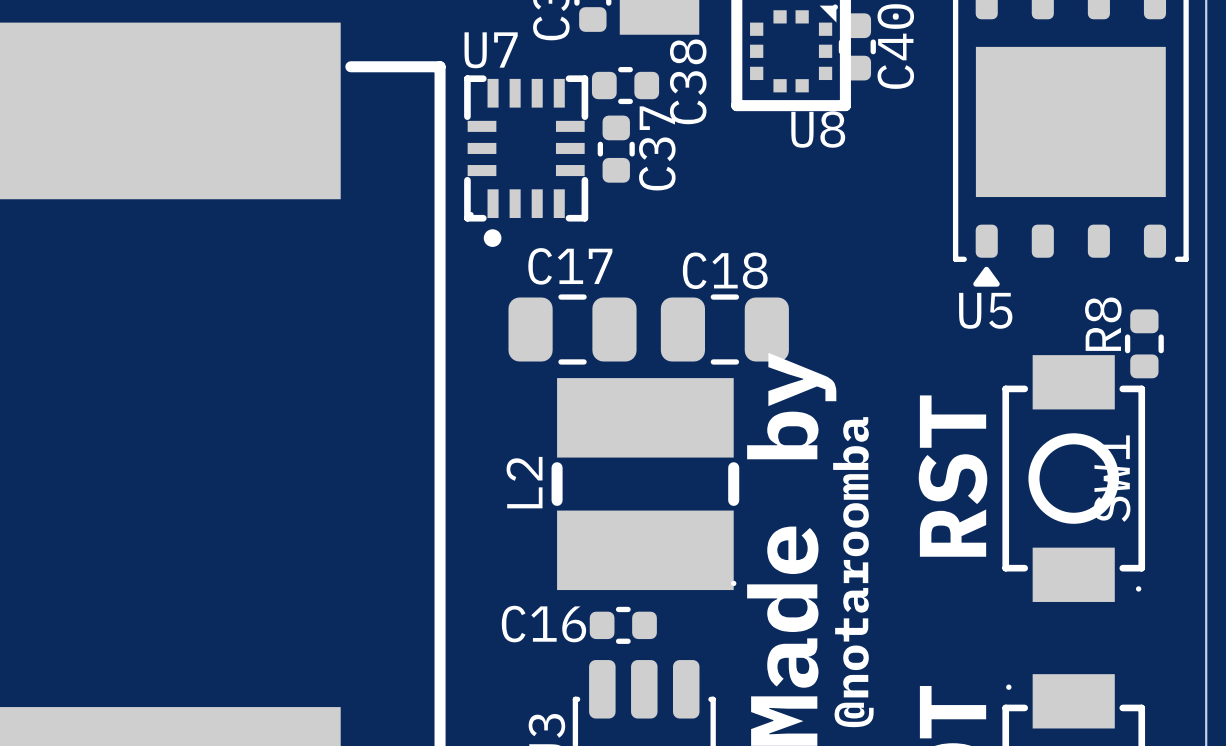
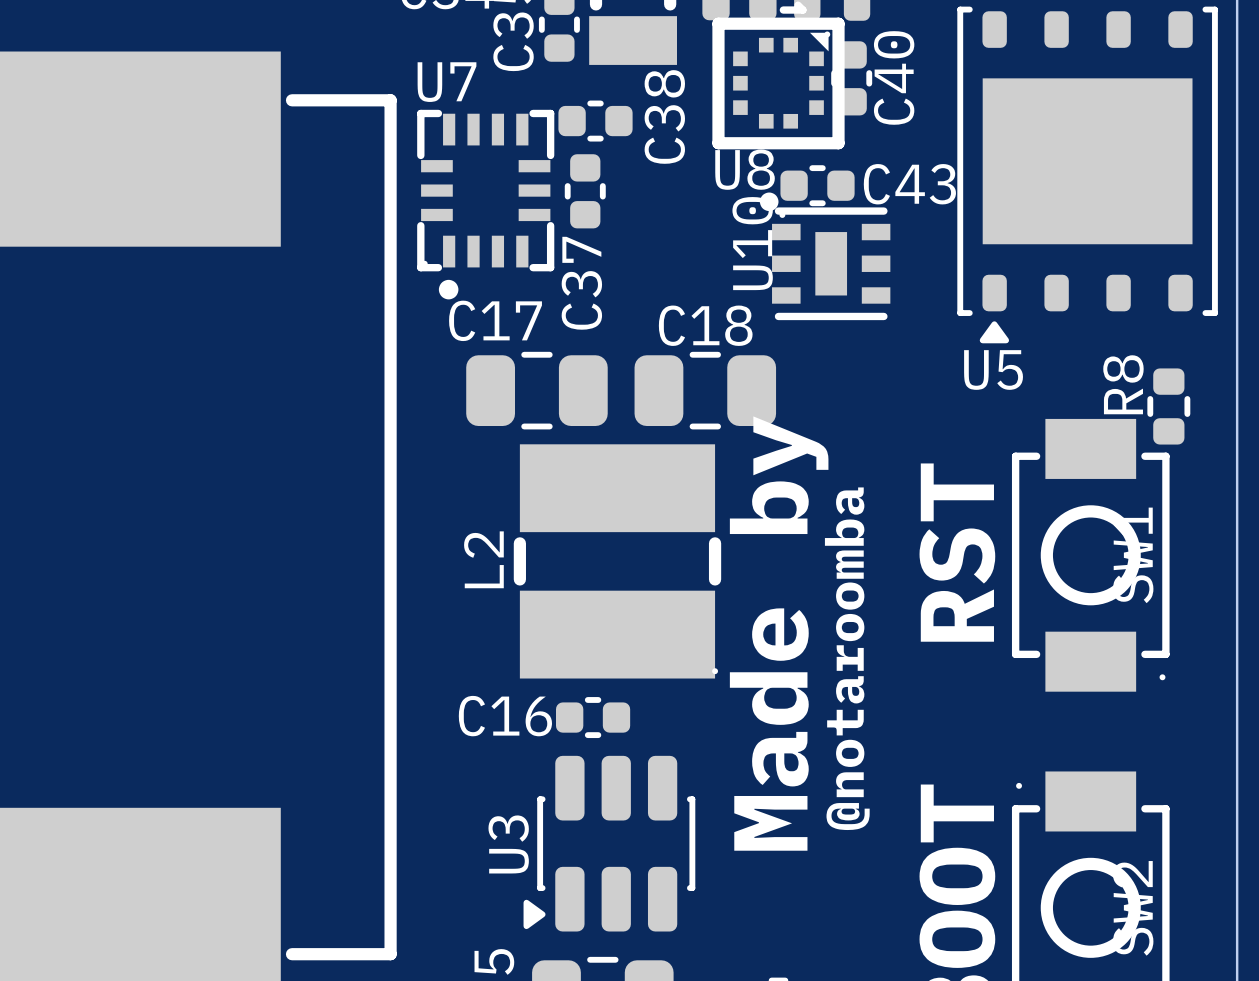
U8 name position: U8 (818, 129) -> U8 (745, 169)
C43: none -> (817, 185)
C37 name position: C37 (657, 148) -> C37 (581, 283)
U10: none -> (825, 256)
C17 name position: C17 (570, 266) -> C17 (495, 320)

